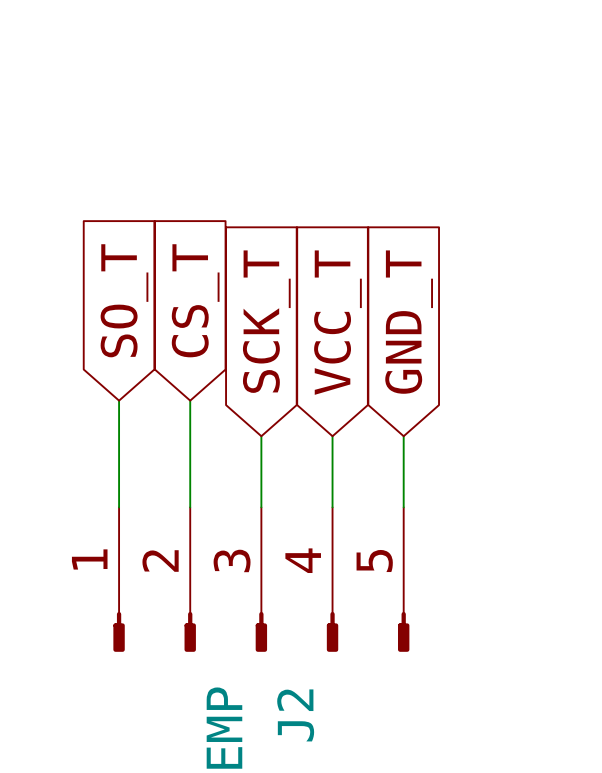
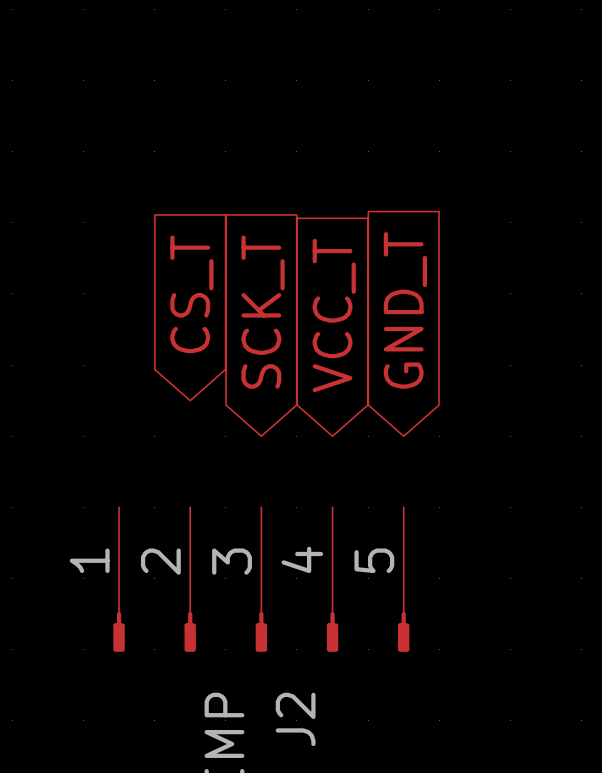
global label: SO_T (124, 300) -> none
wire: (119, 400) (119, 507) -> none
wire: (190, 400) (190, 507) -> none
wire: (261, 436) (261, 507) -> none
wire: (332, 436) (332, 507) -> none
wire: (403, 436) (403, 507) -> none

